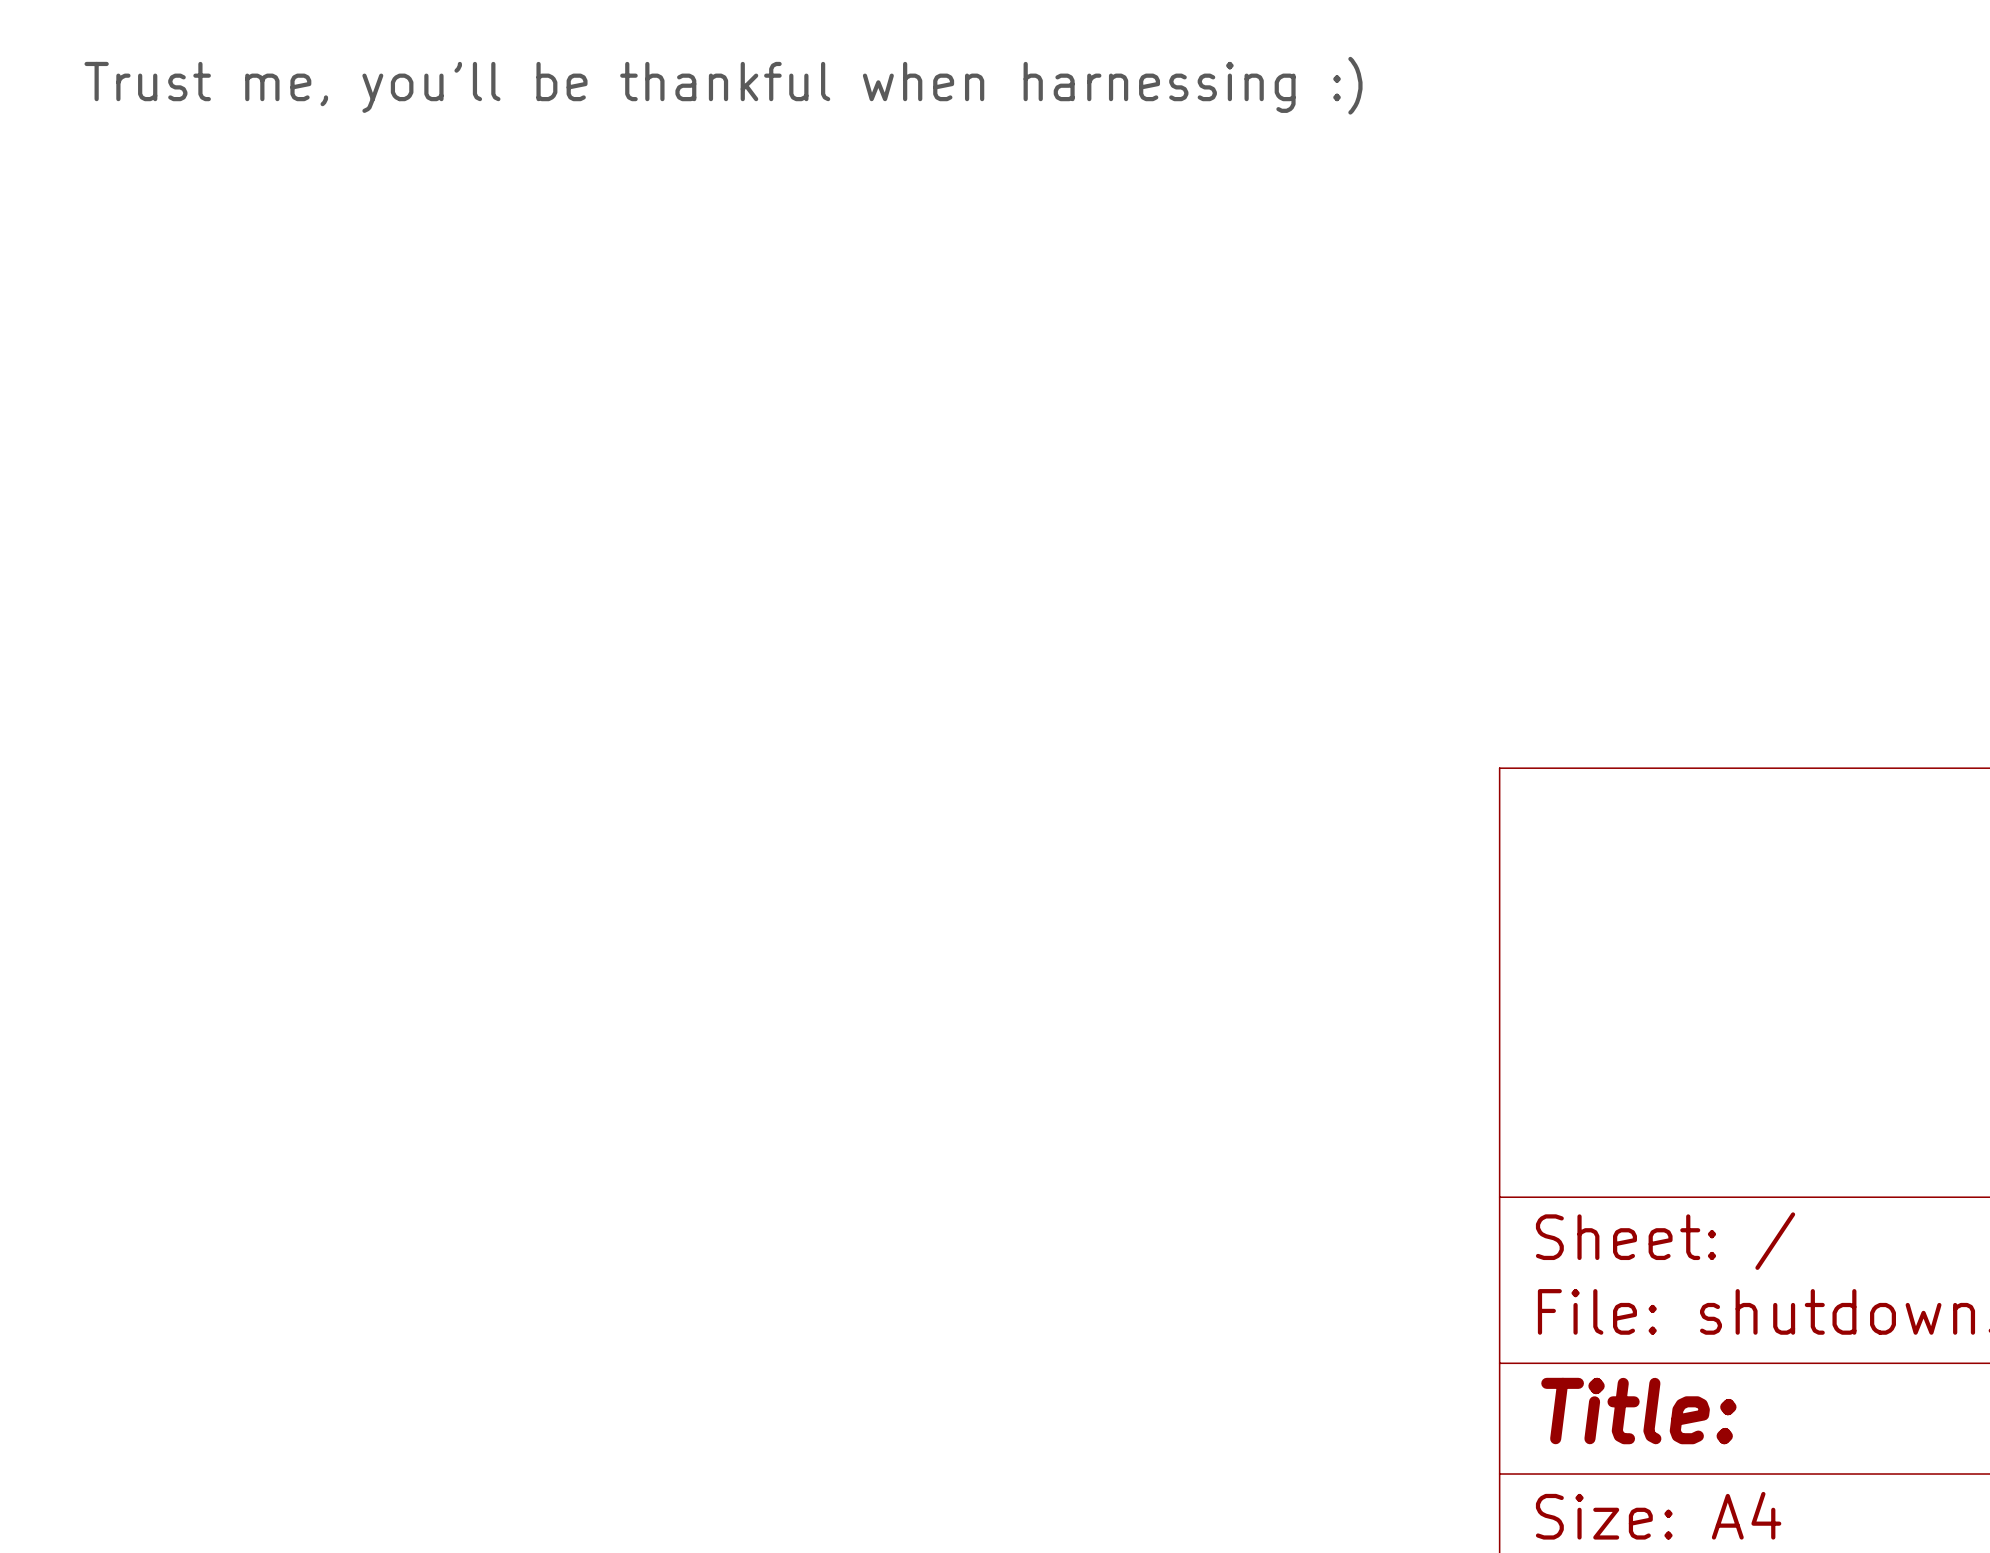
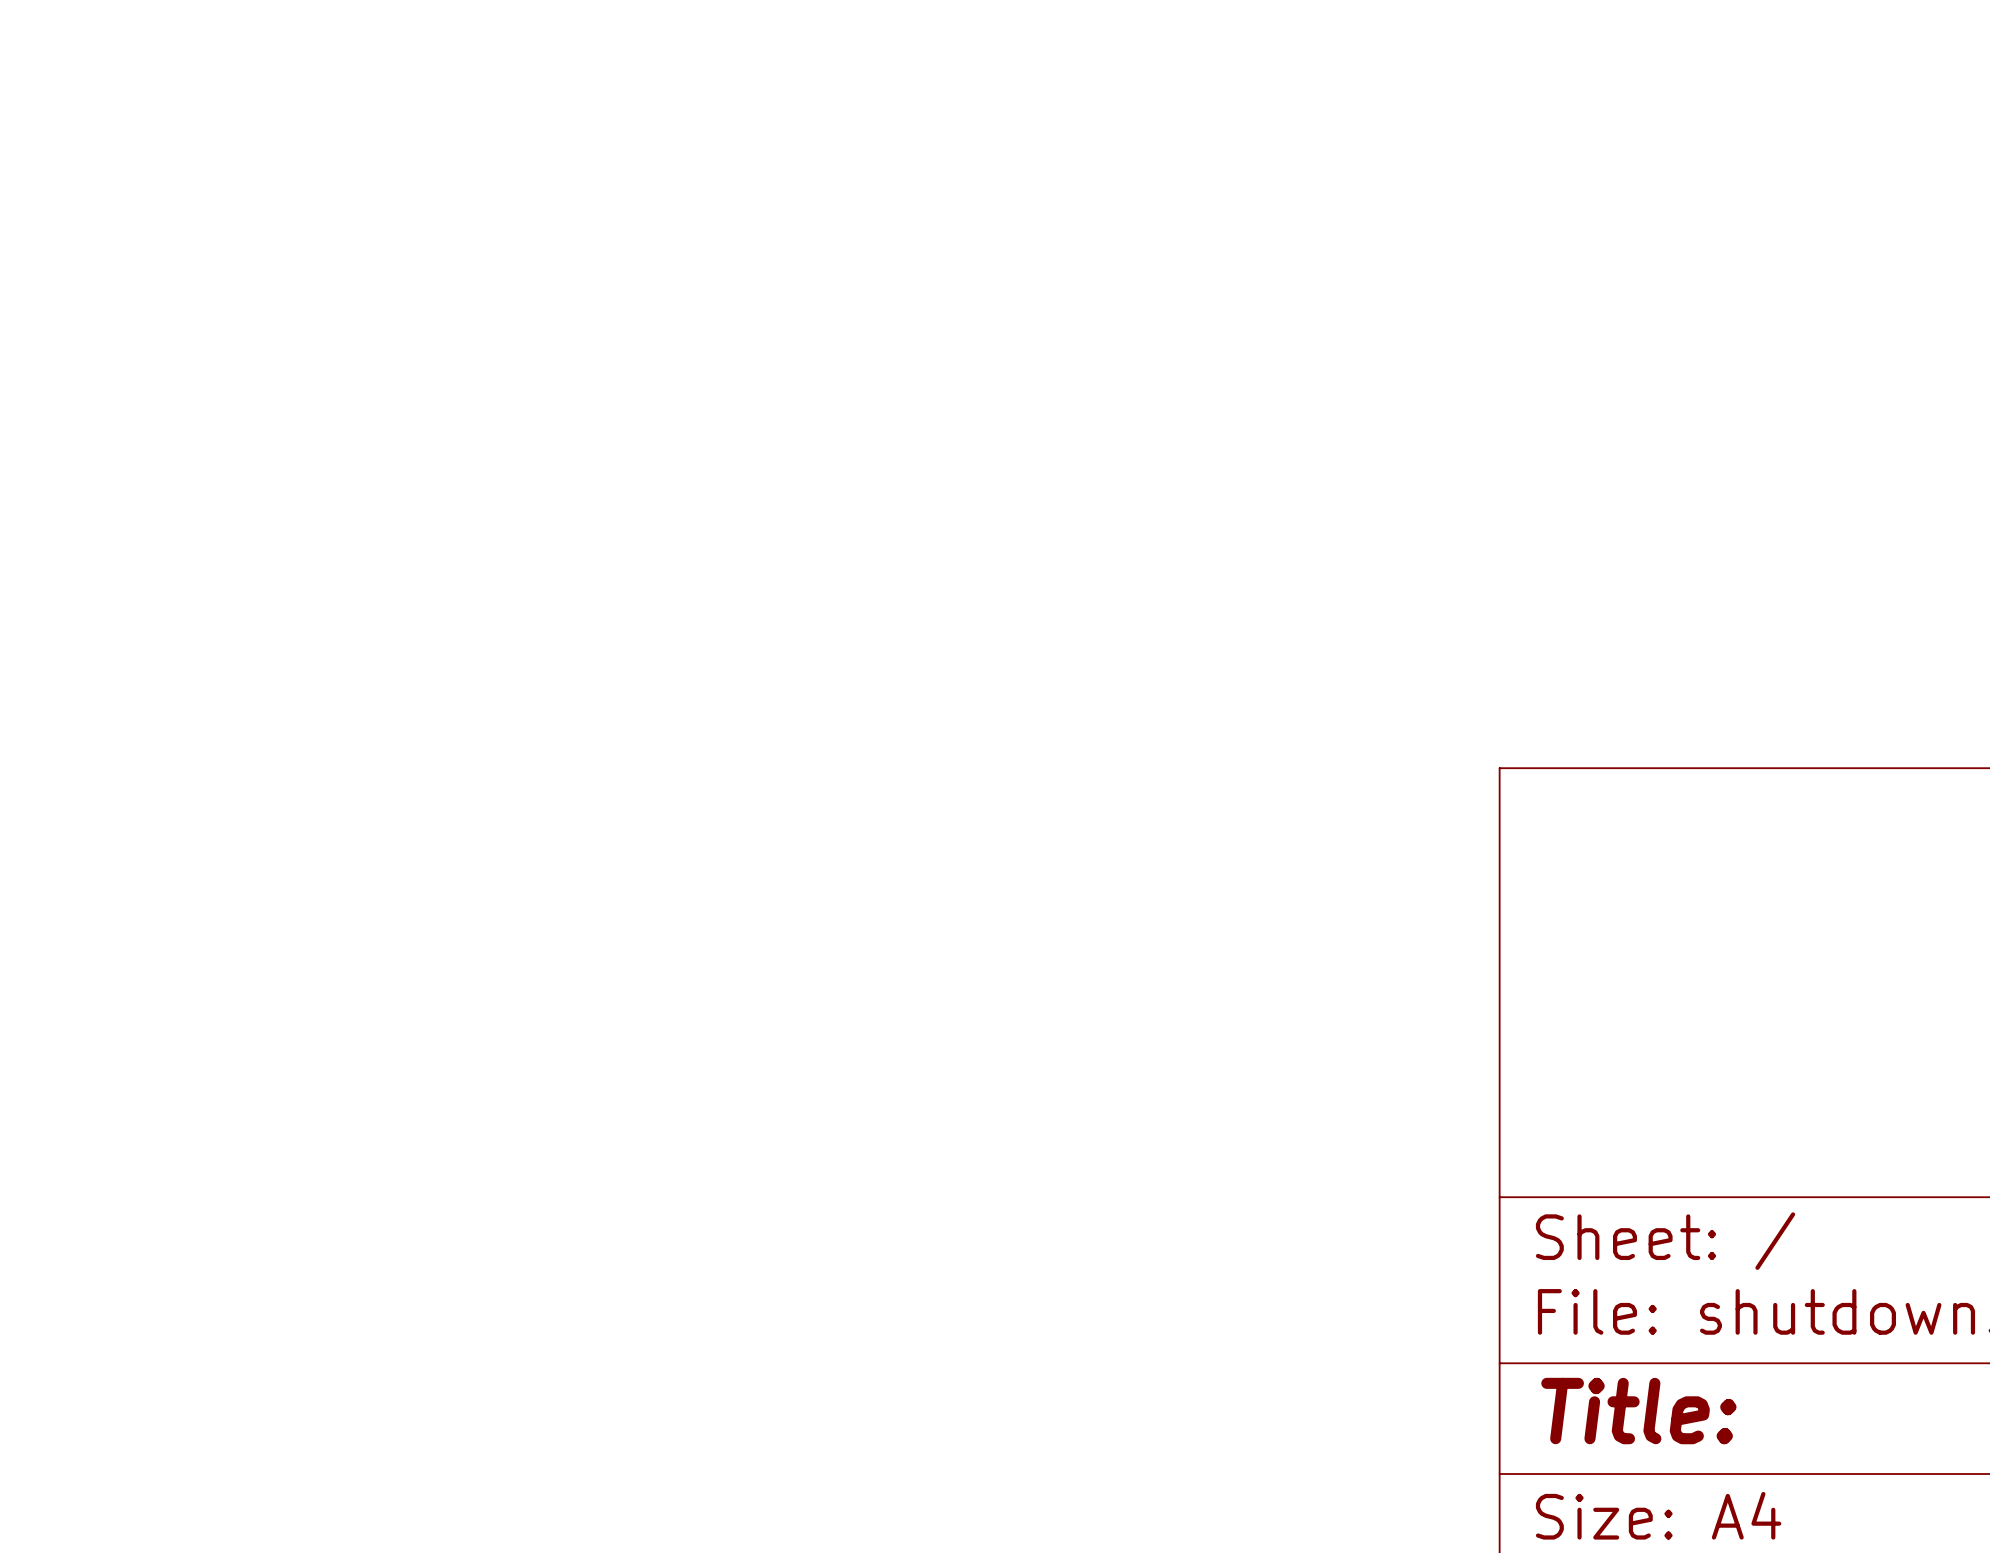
text: Trust me, you’ll be thankful when harnessing :) (723, 85) -> none

